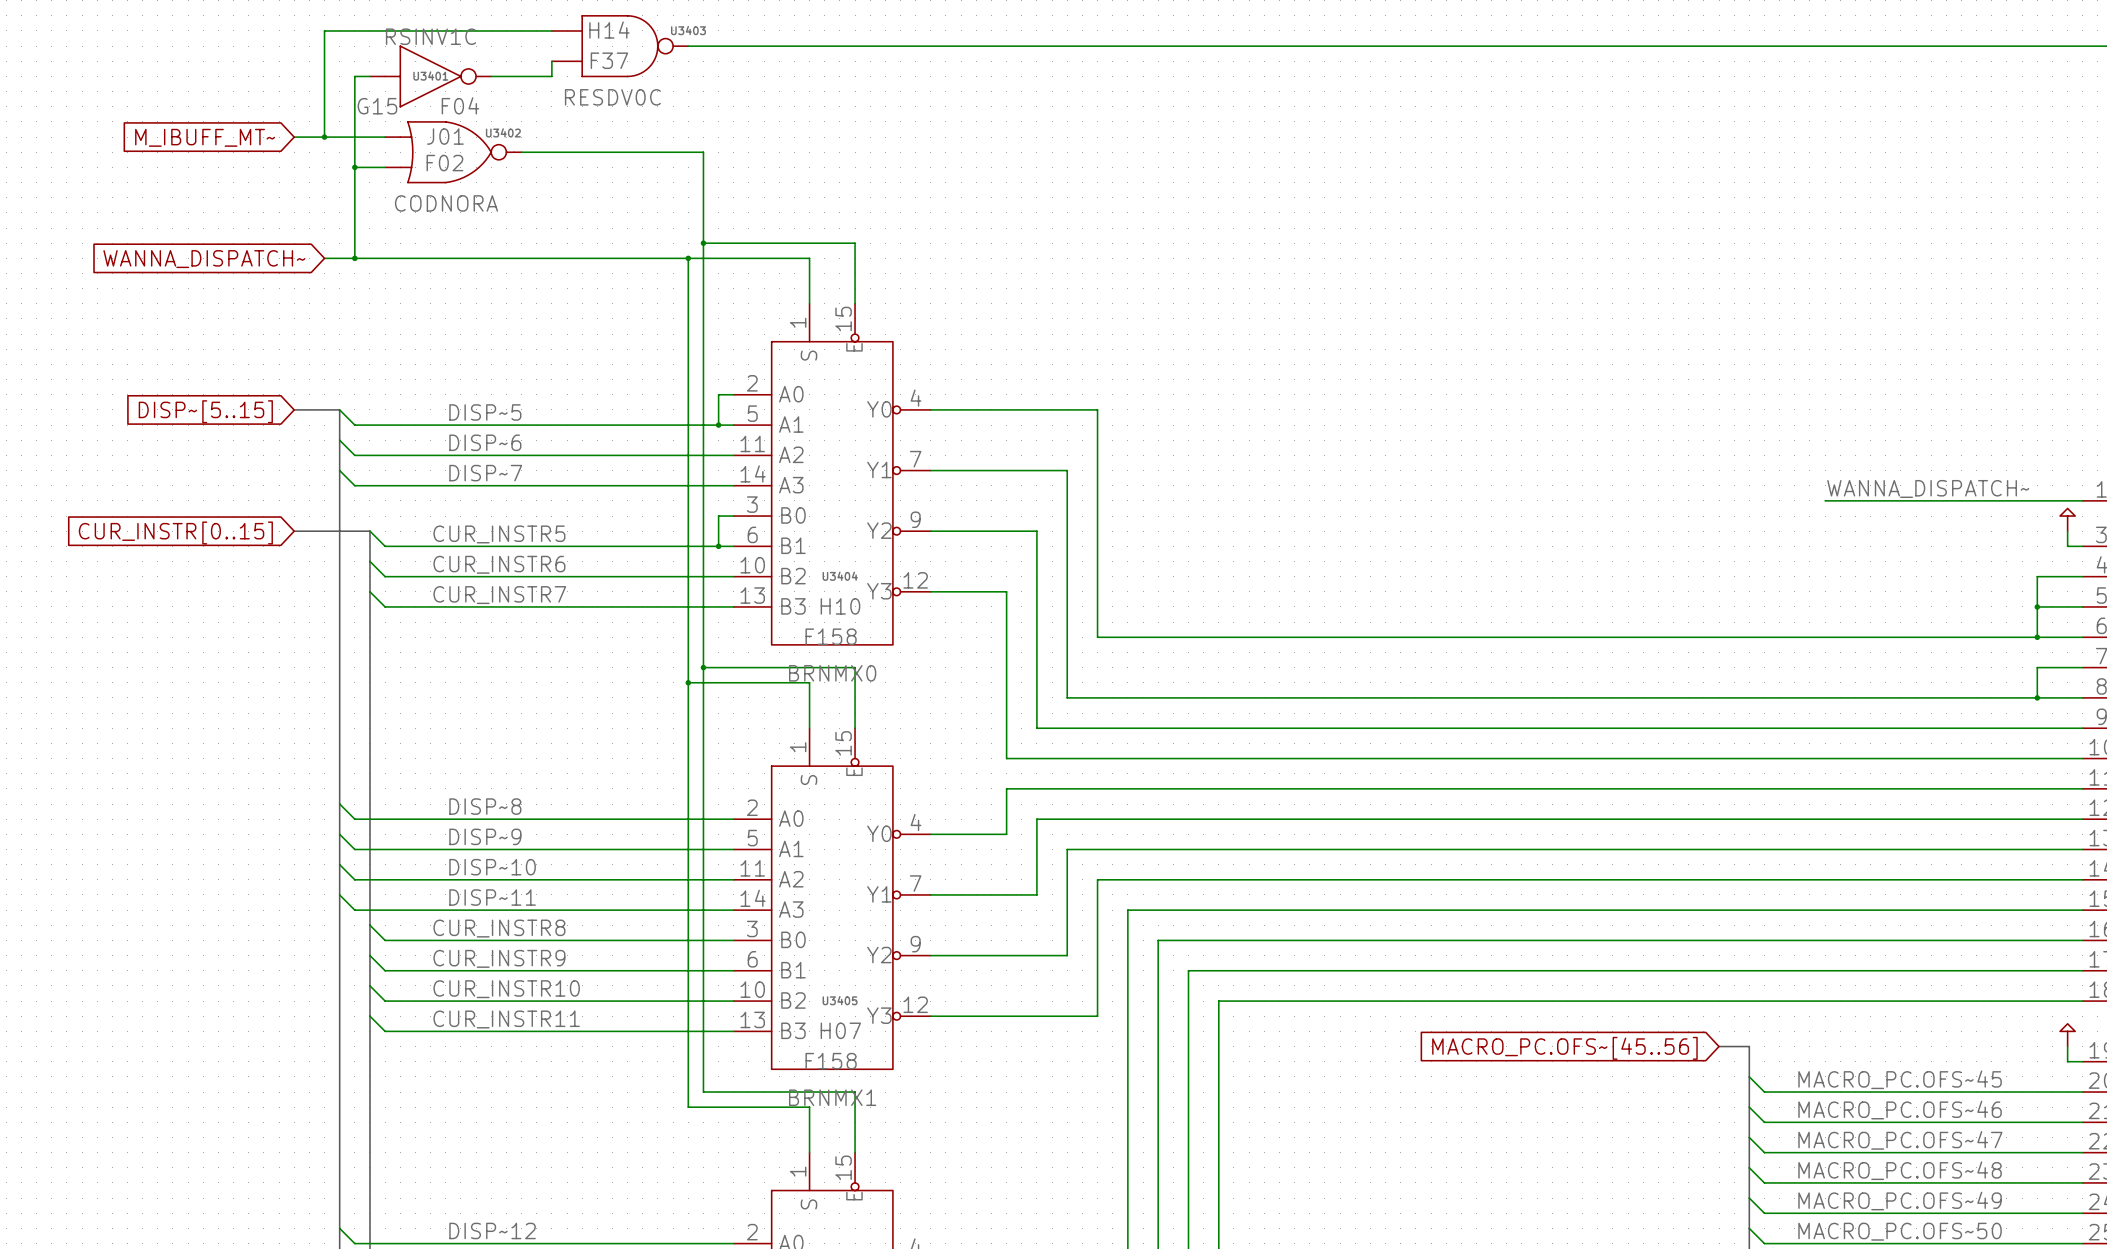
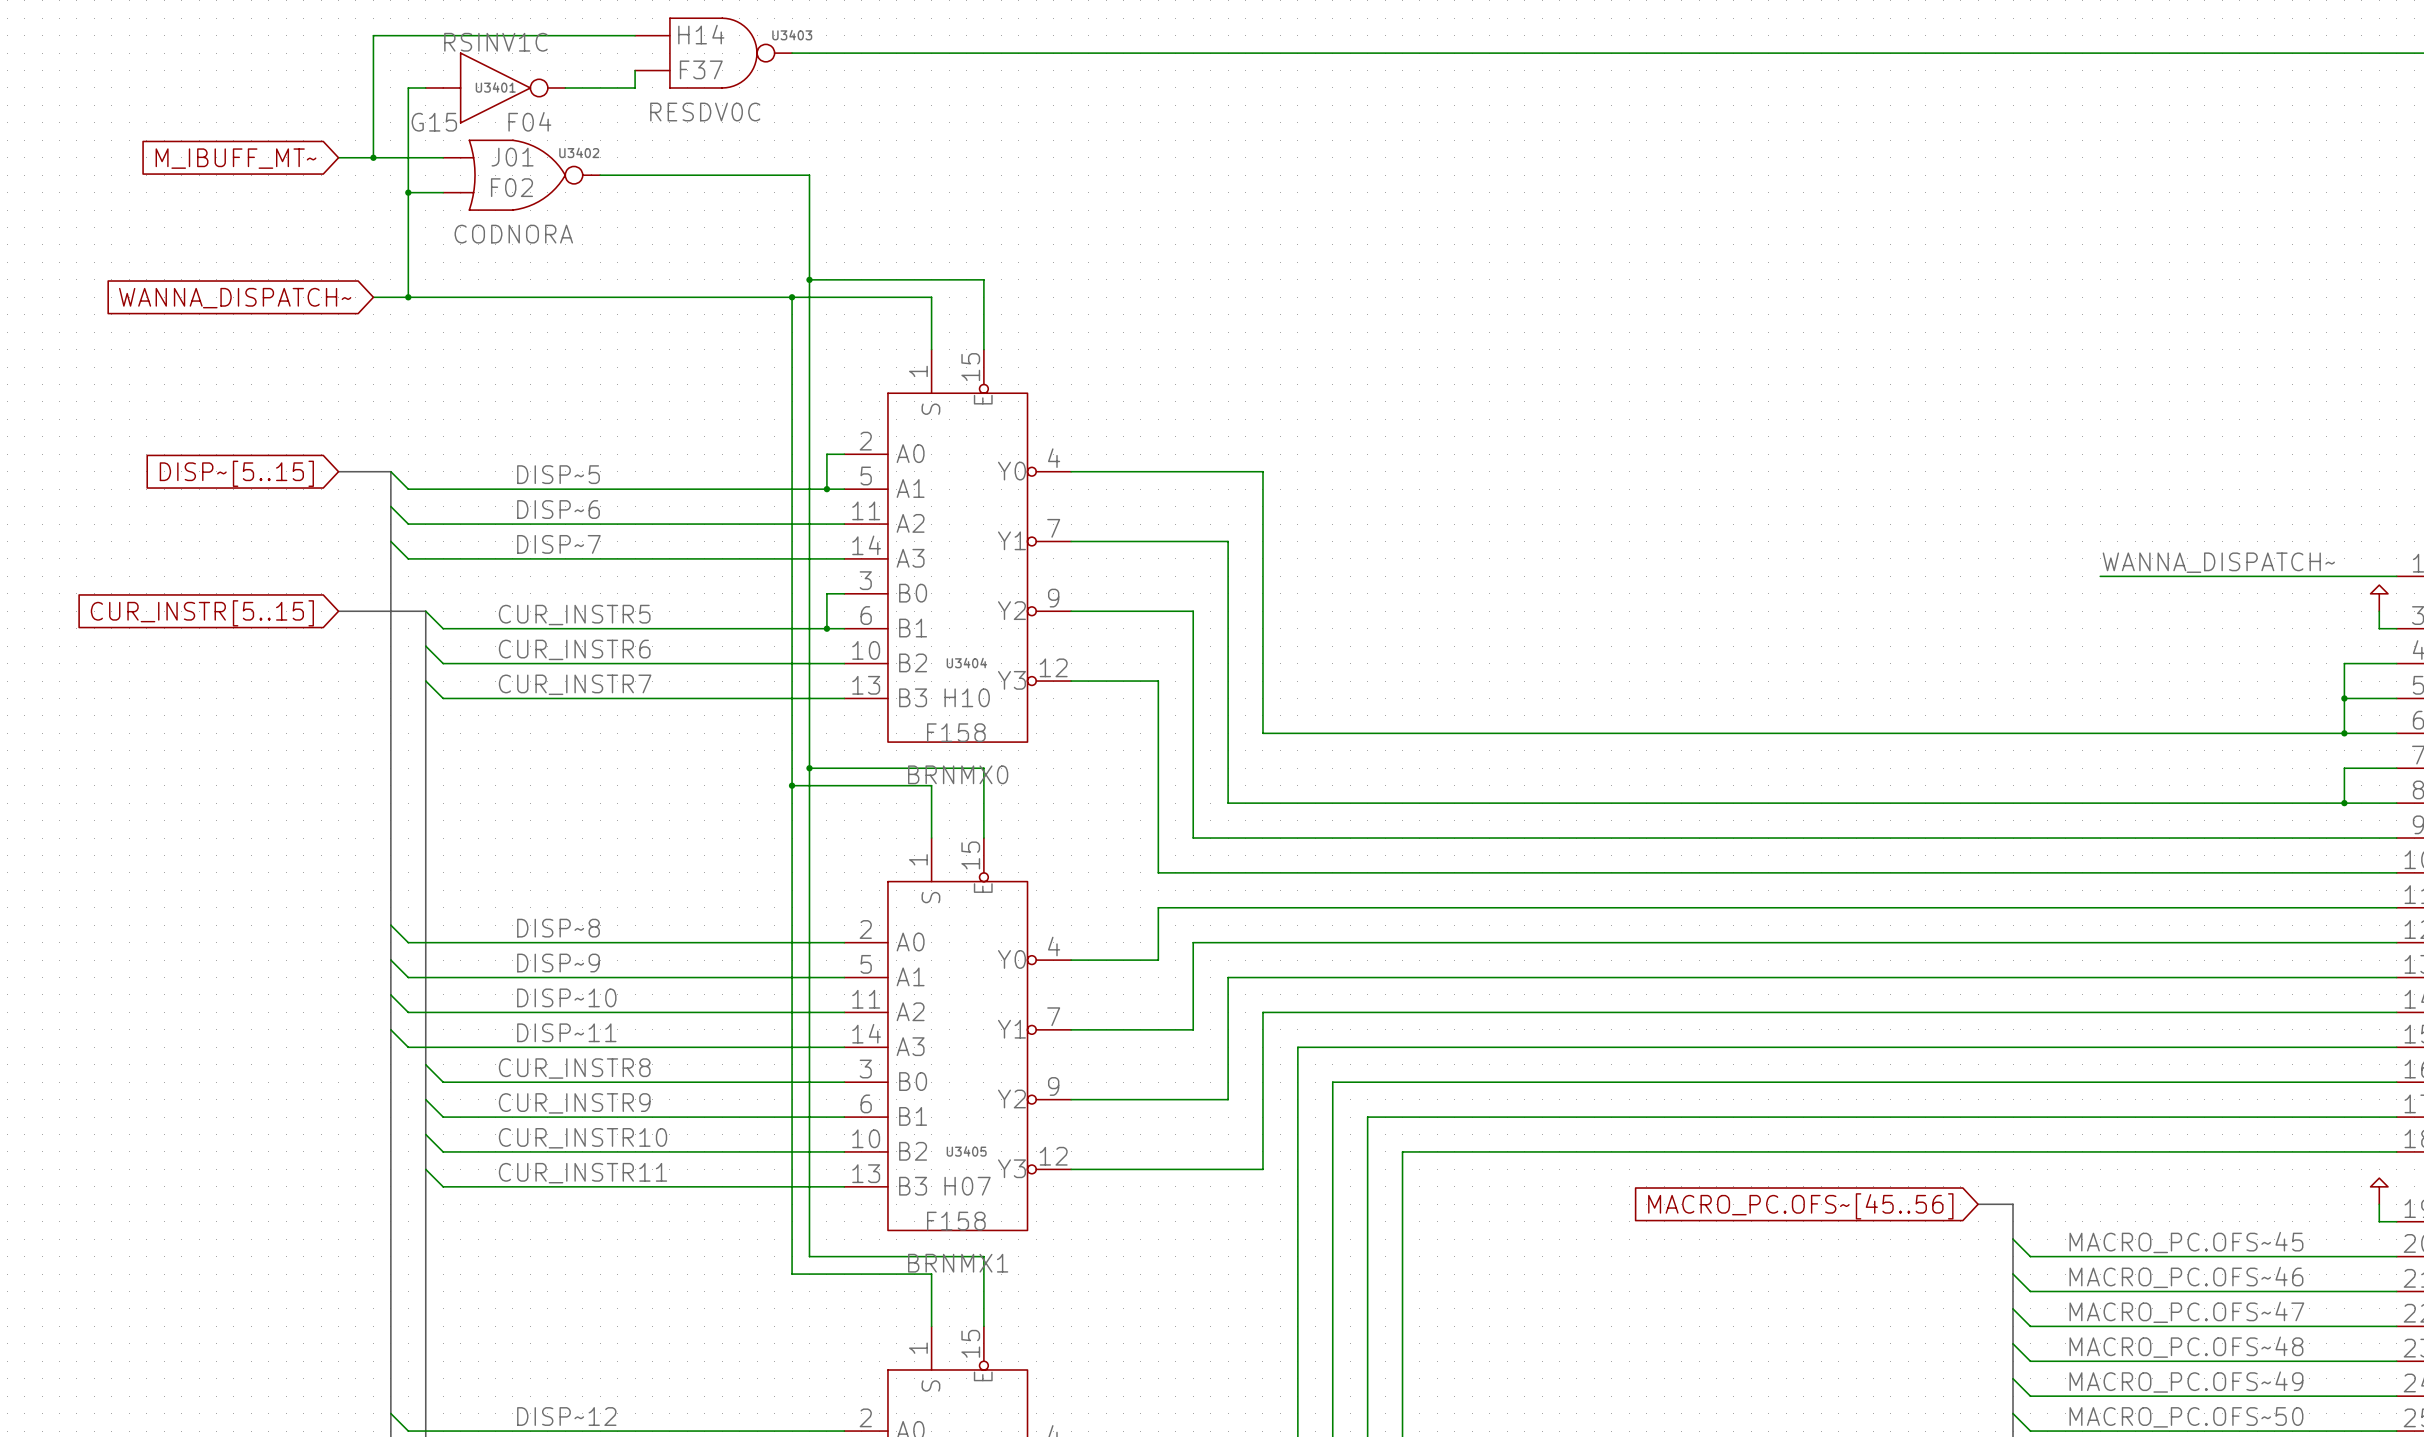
global label: CUR_INSTR[0..15] (175, 532) -> CUR_INSTR[5..15] (202, 613)

